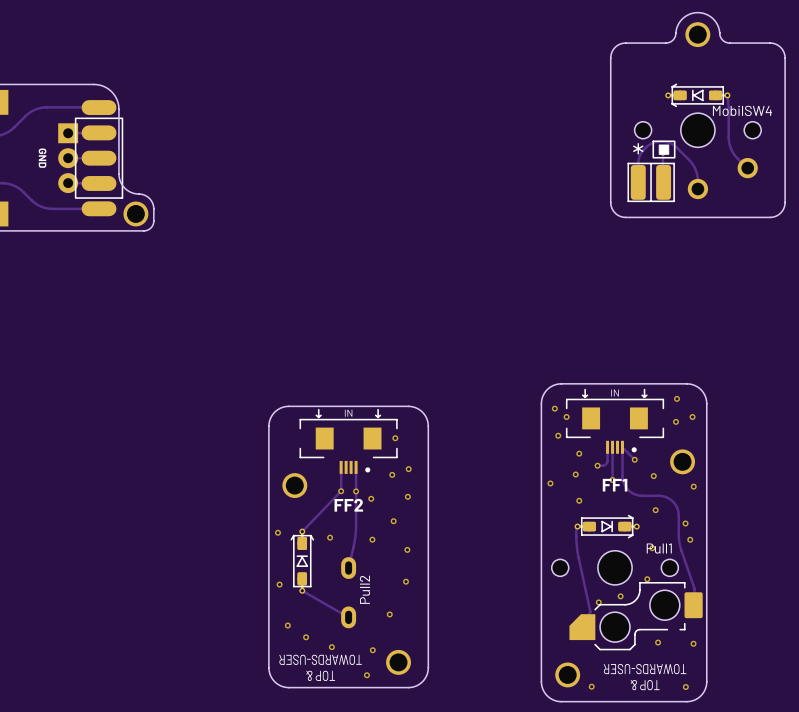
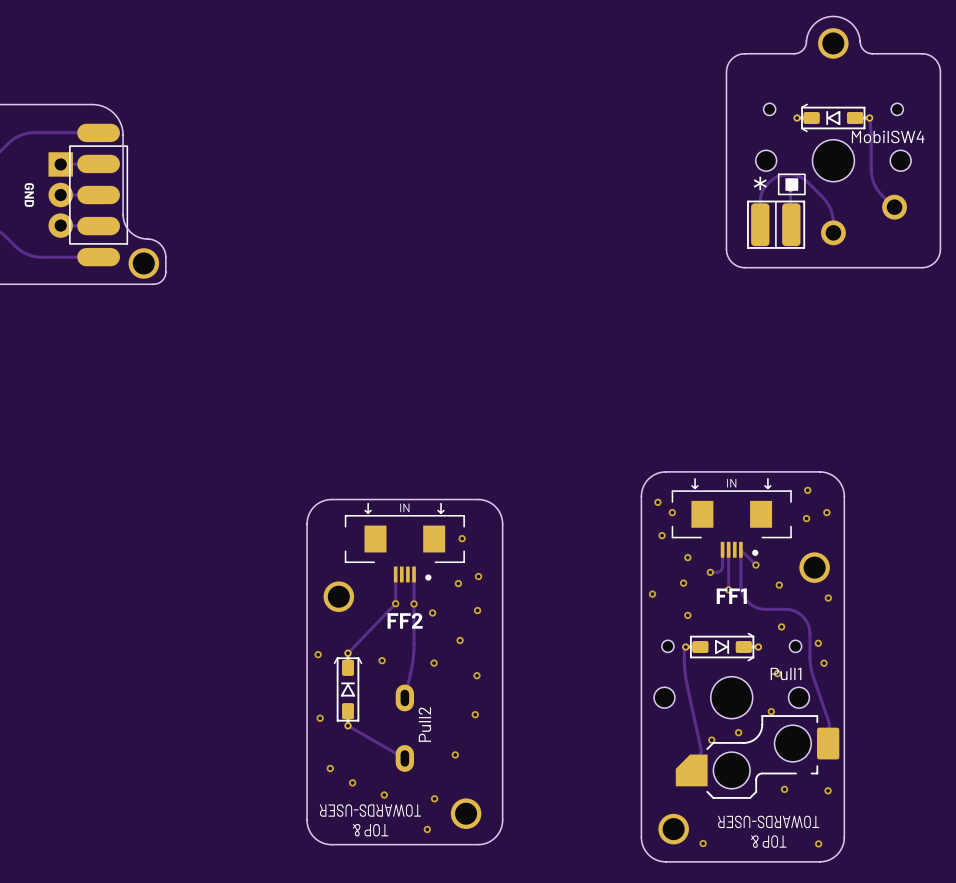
MobilSW4 footprint: [634, 113, 762, 200] -> [755, 103, 912, 246]
Pull1 footprint: [551, 550, 703, 651] -> [654, 640, 840, 799]

